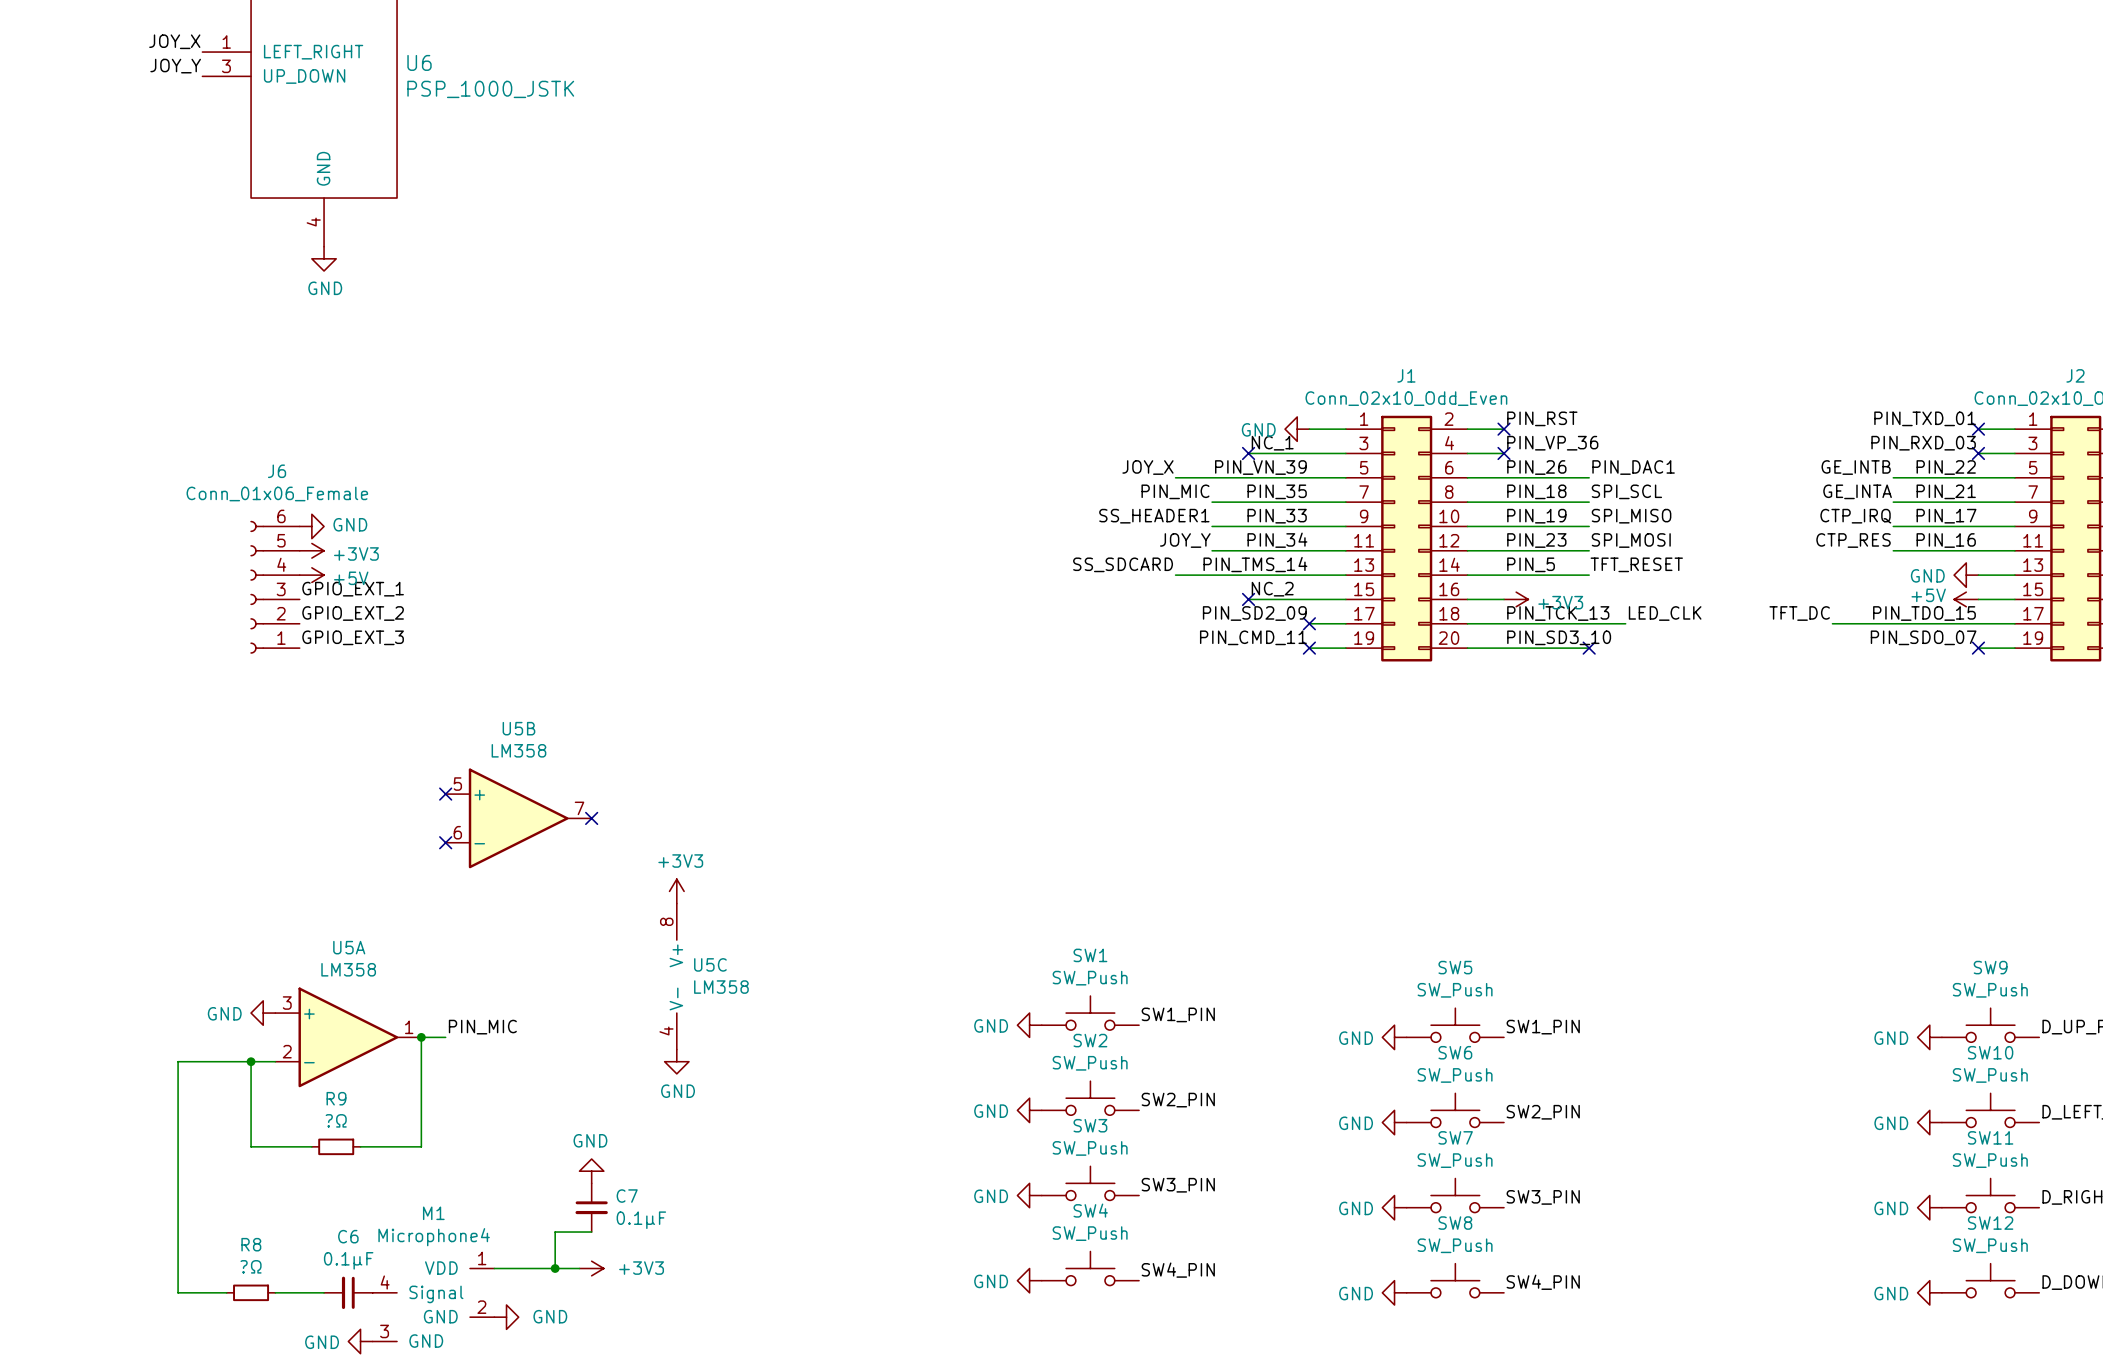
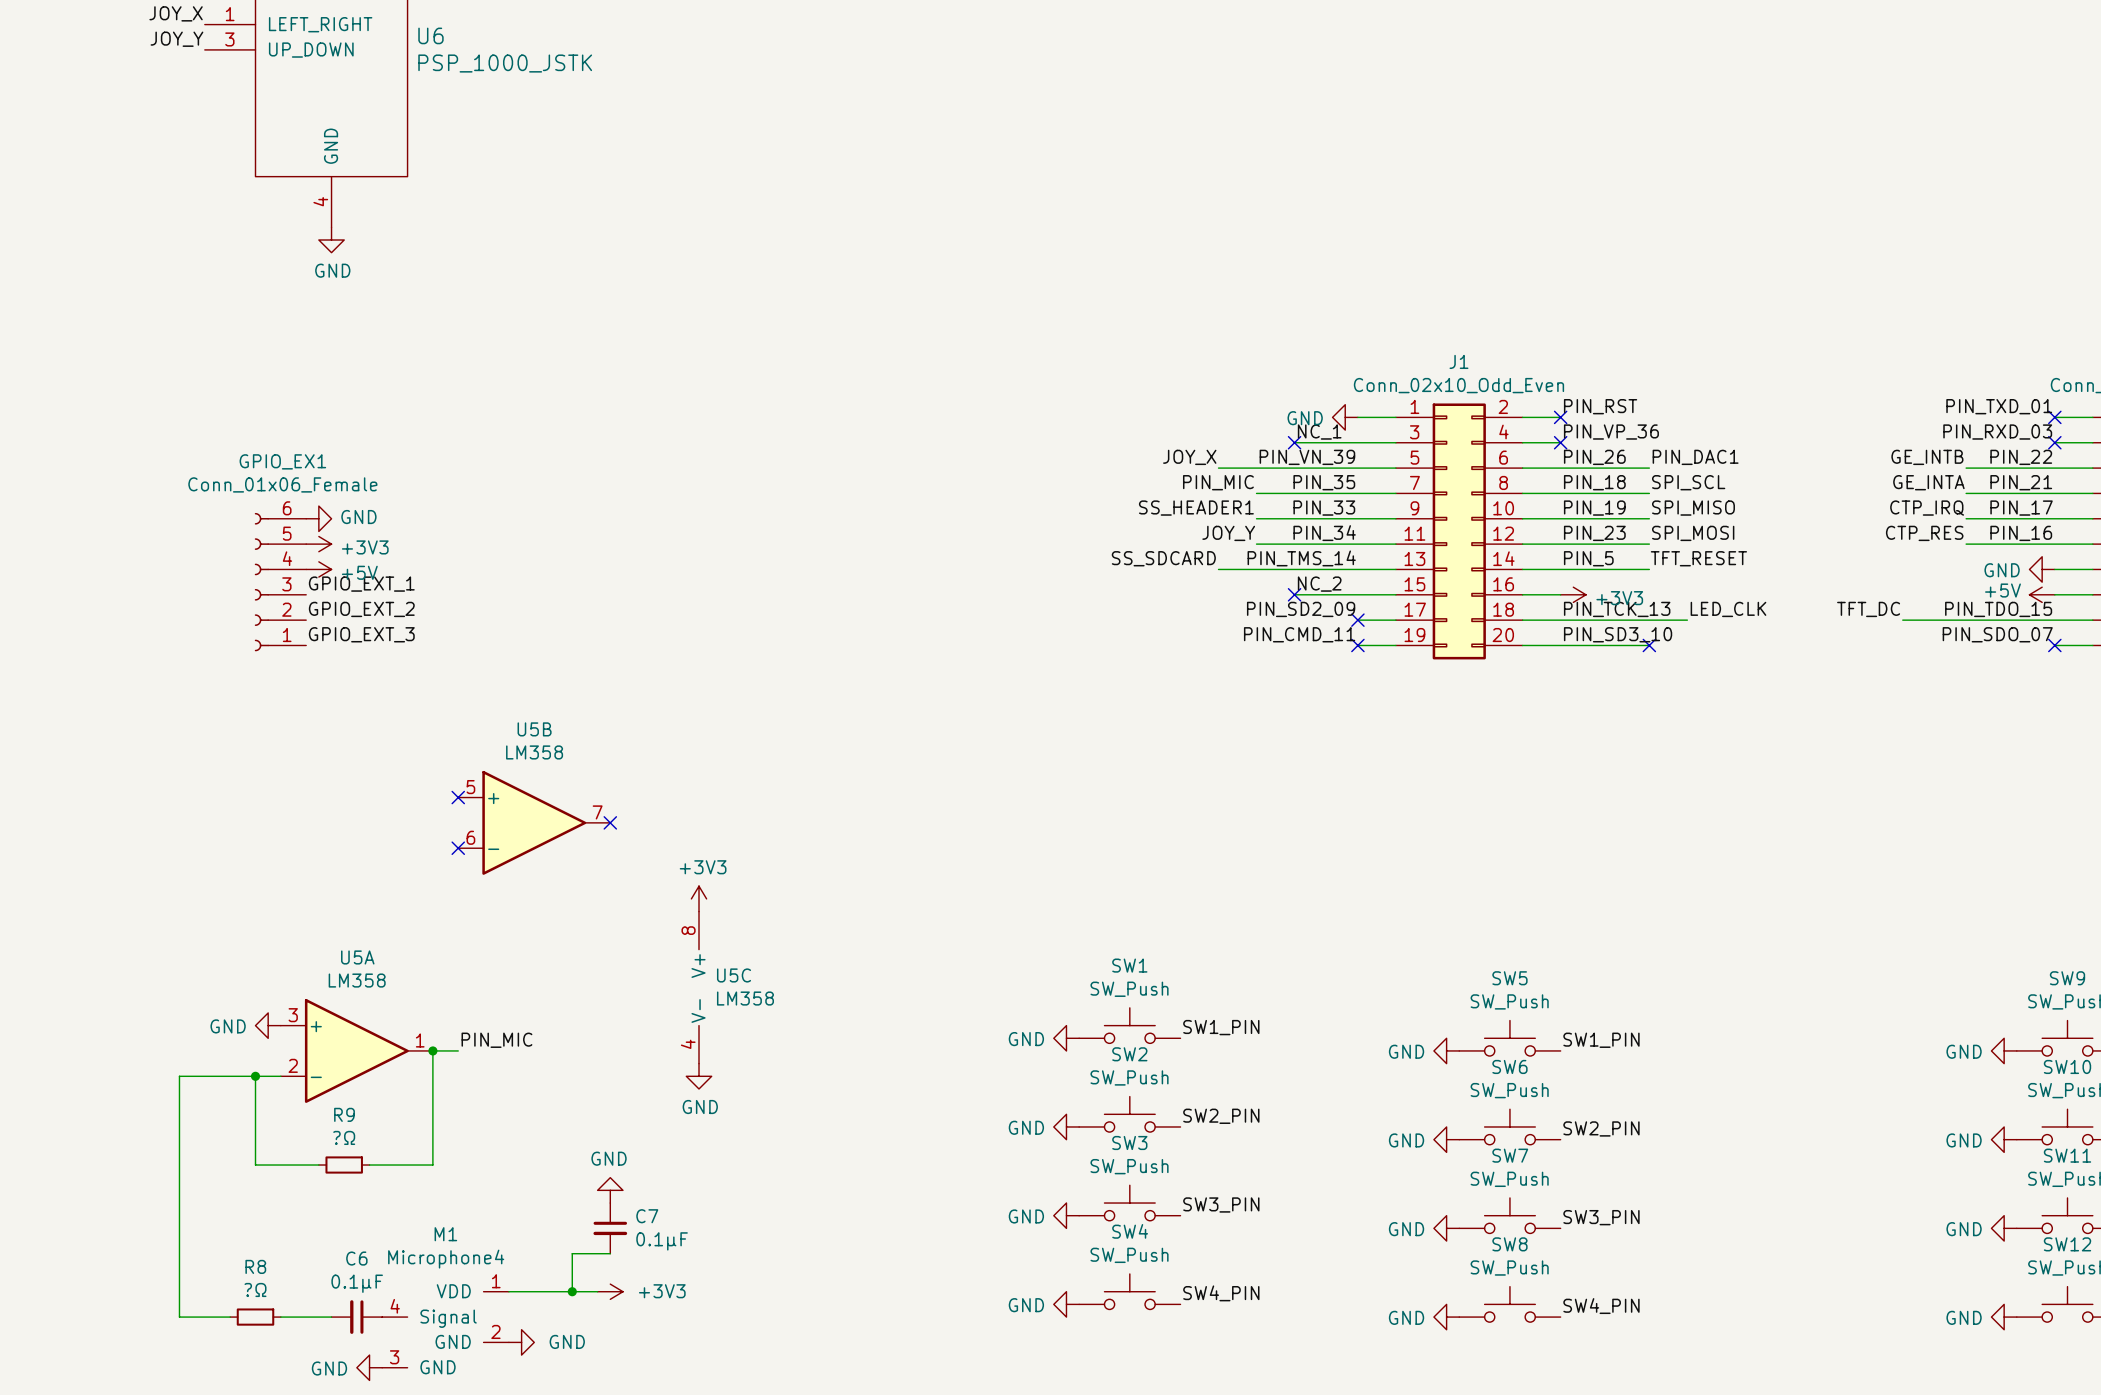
J6 name: J6 (277, 471) -> GPIO_EX1 (282, 461)

